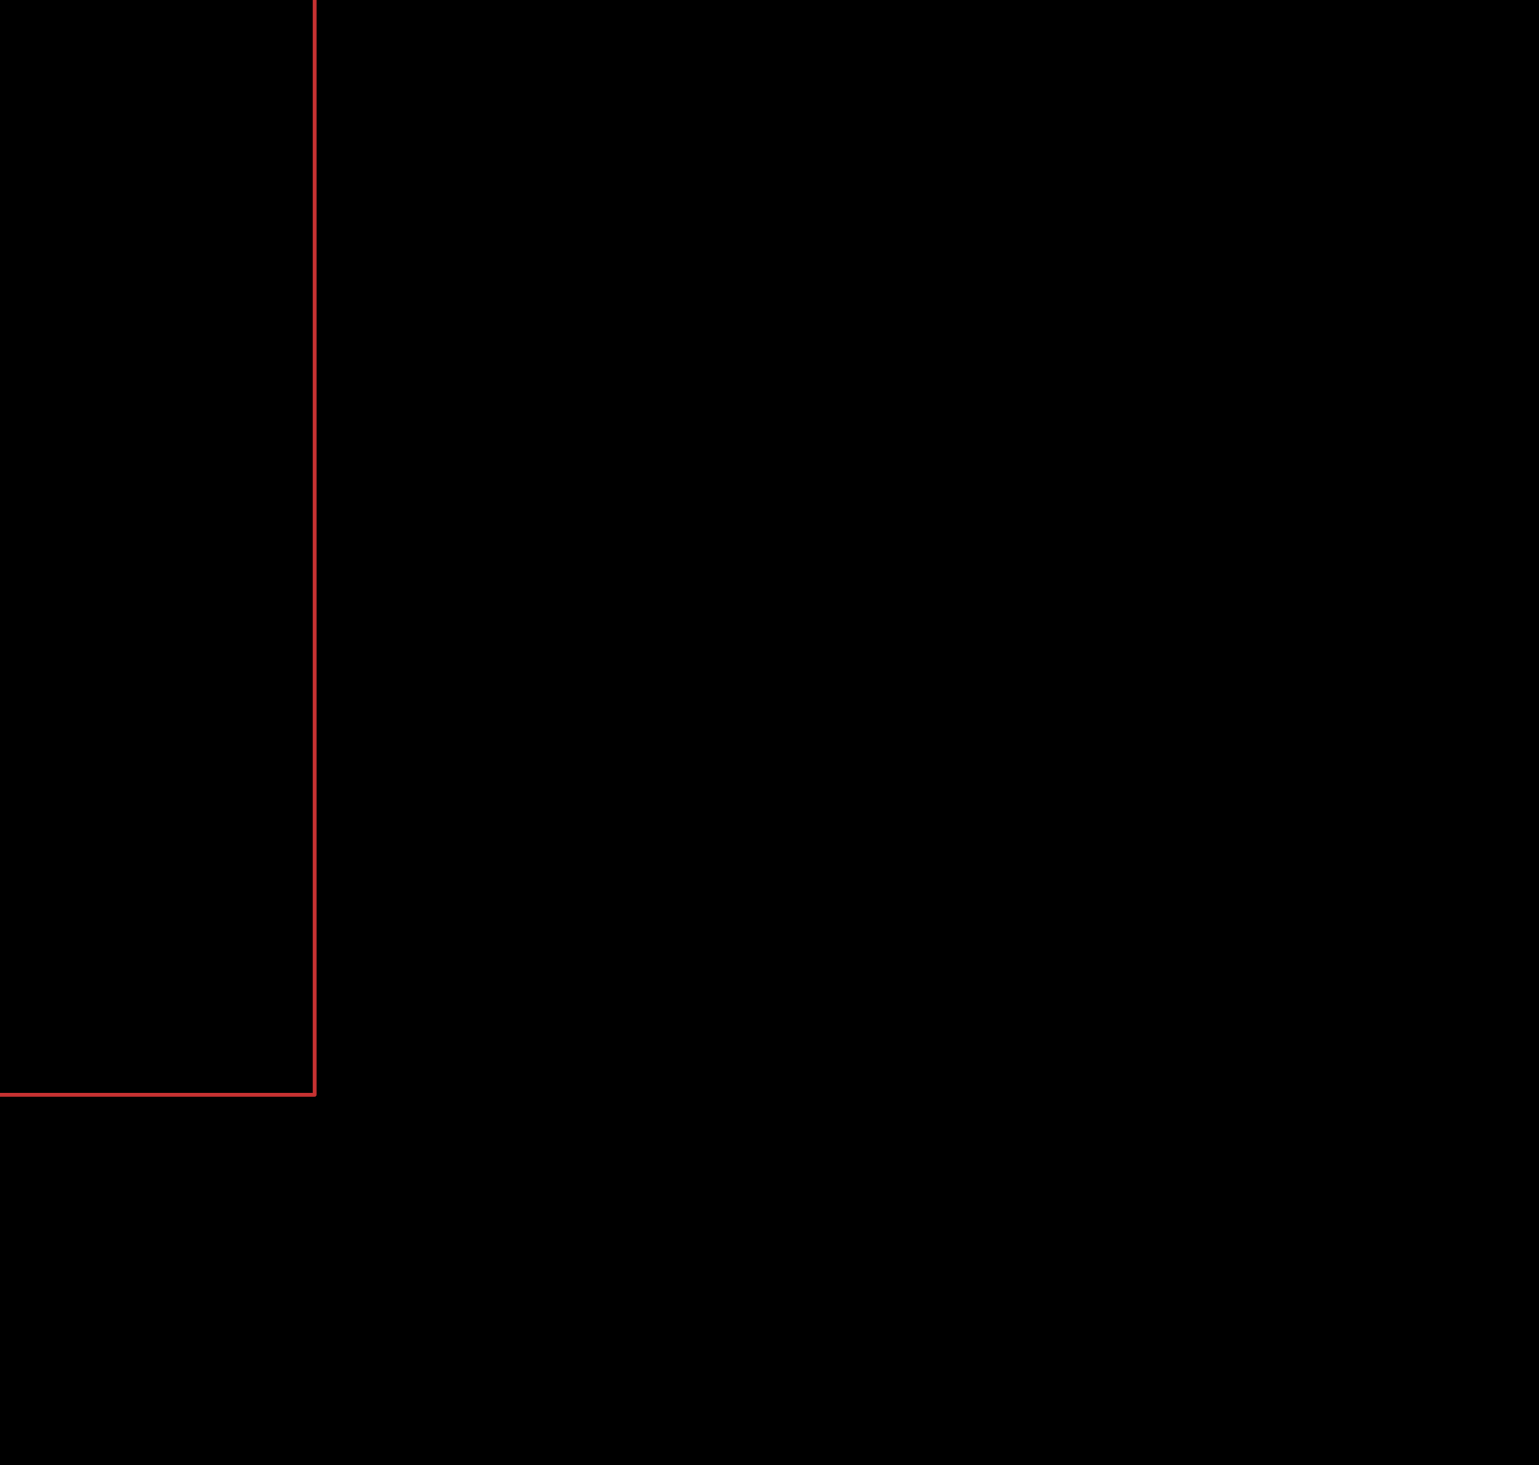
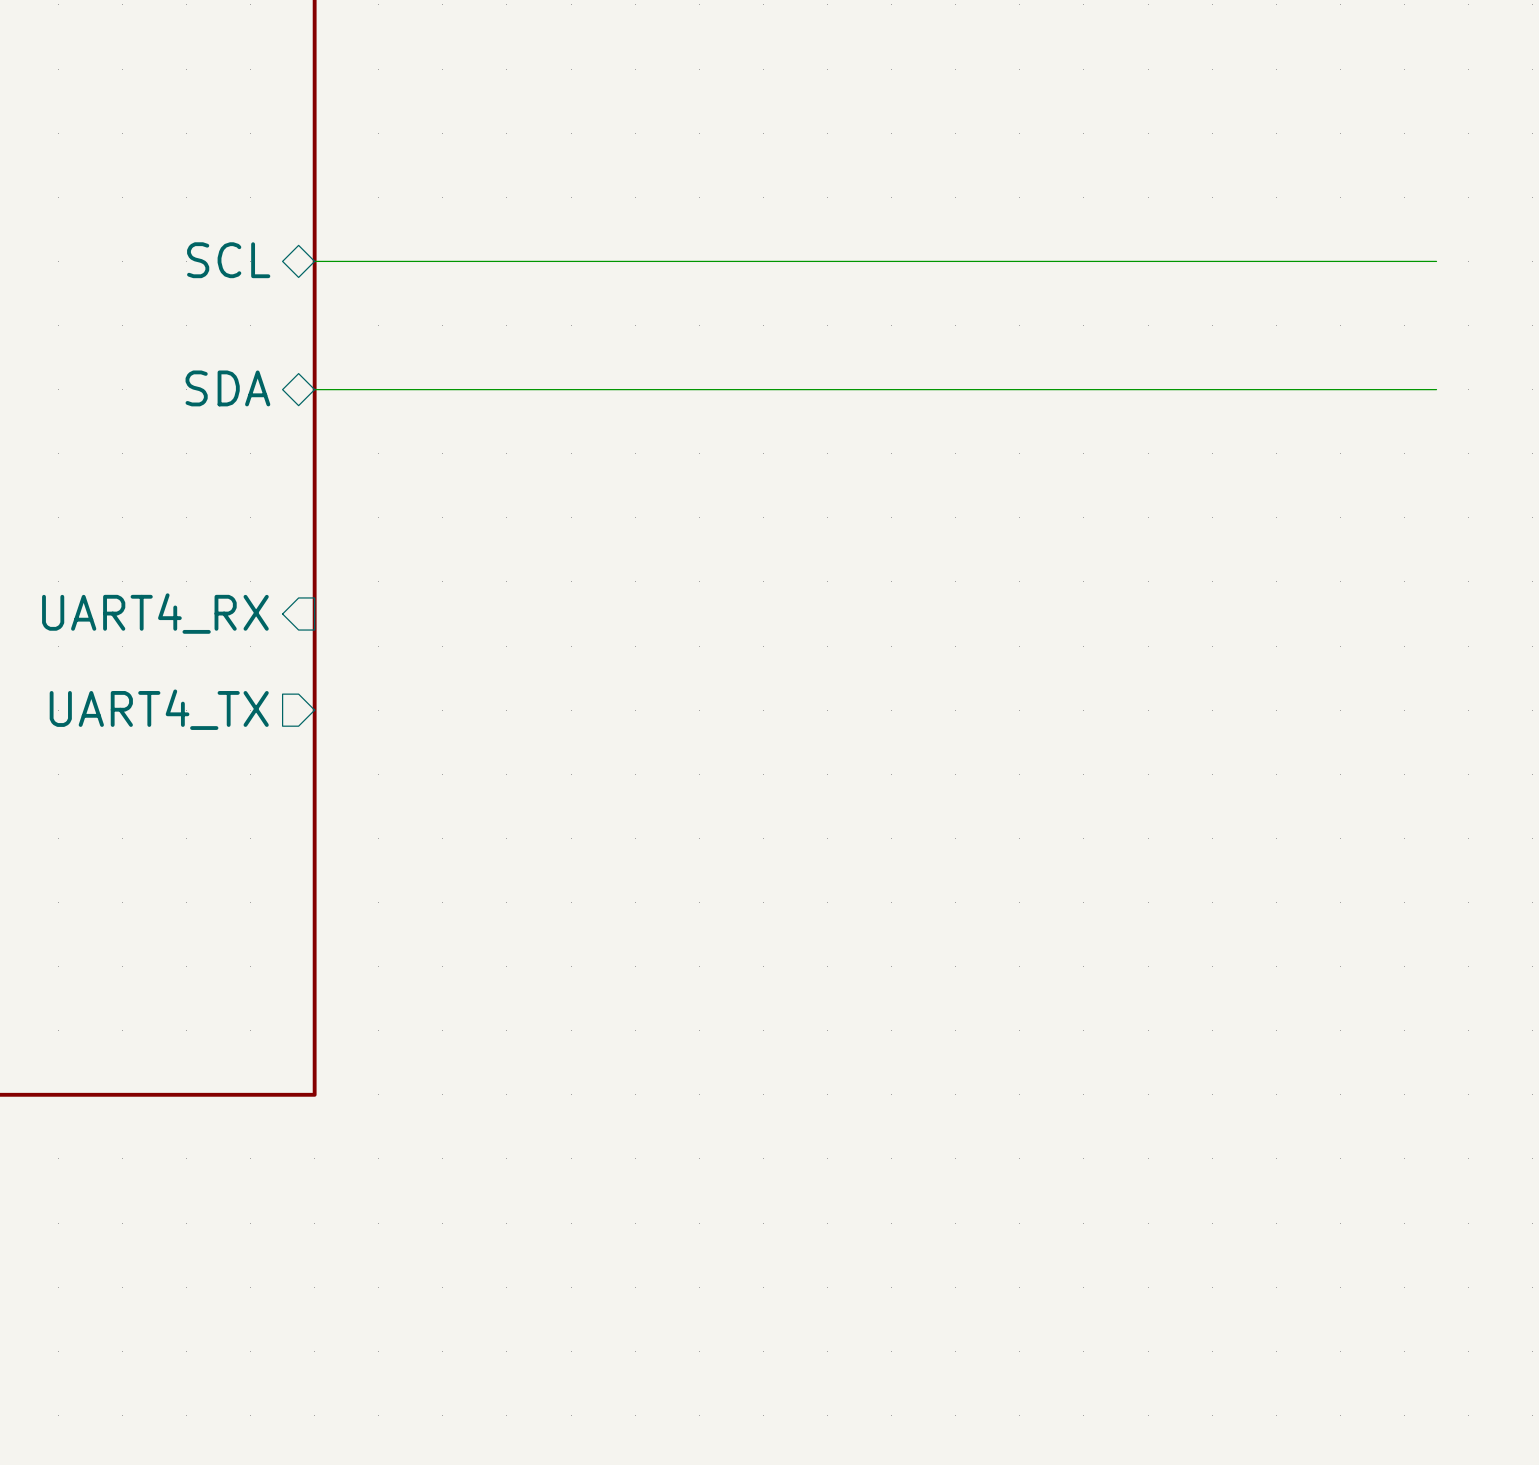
sheet pin: none -> SCL (228, 260)
wire: none -> (314, 261) (1436, 261)
sheet pin: none -> SDA (227, 388)
wire: none -> (314, 389) (1436, 389)
sheet pin: none -> UART4_RX (155, 613)
sheet pin: none -> UART4_TX (159, 709)

